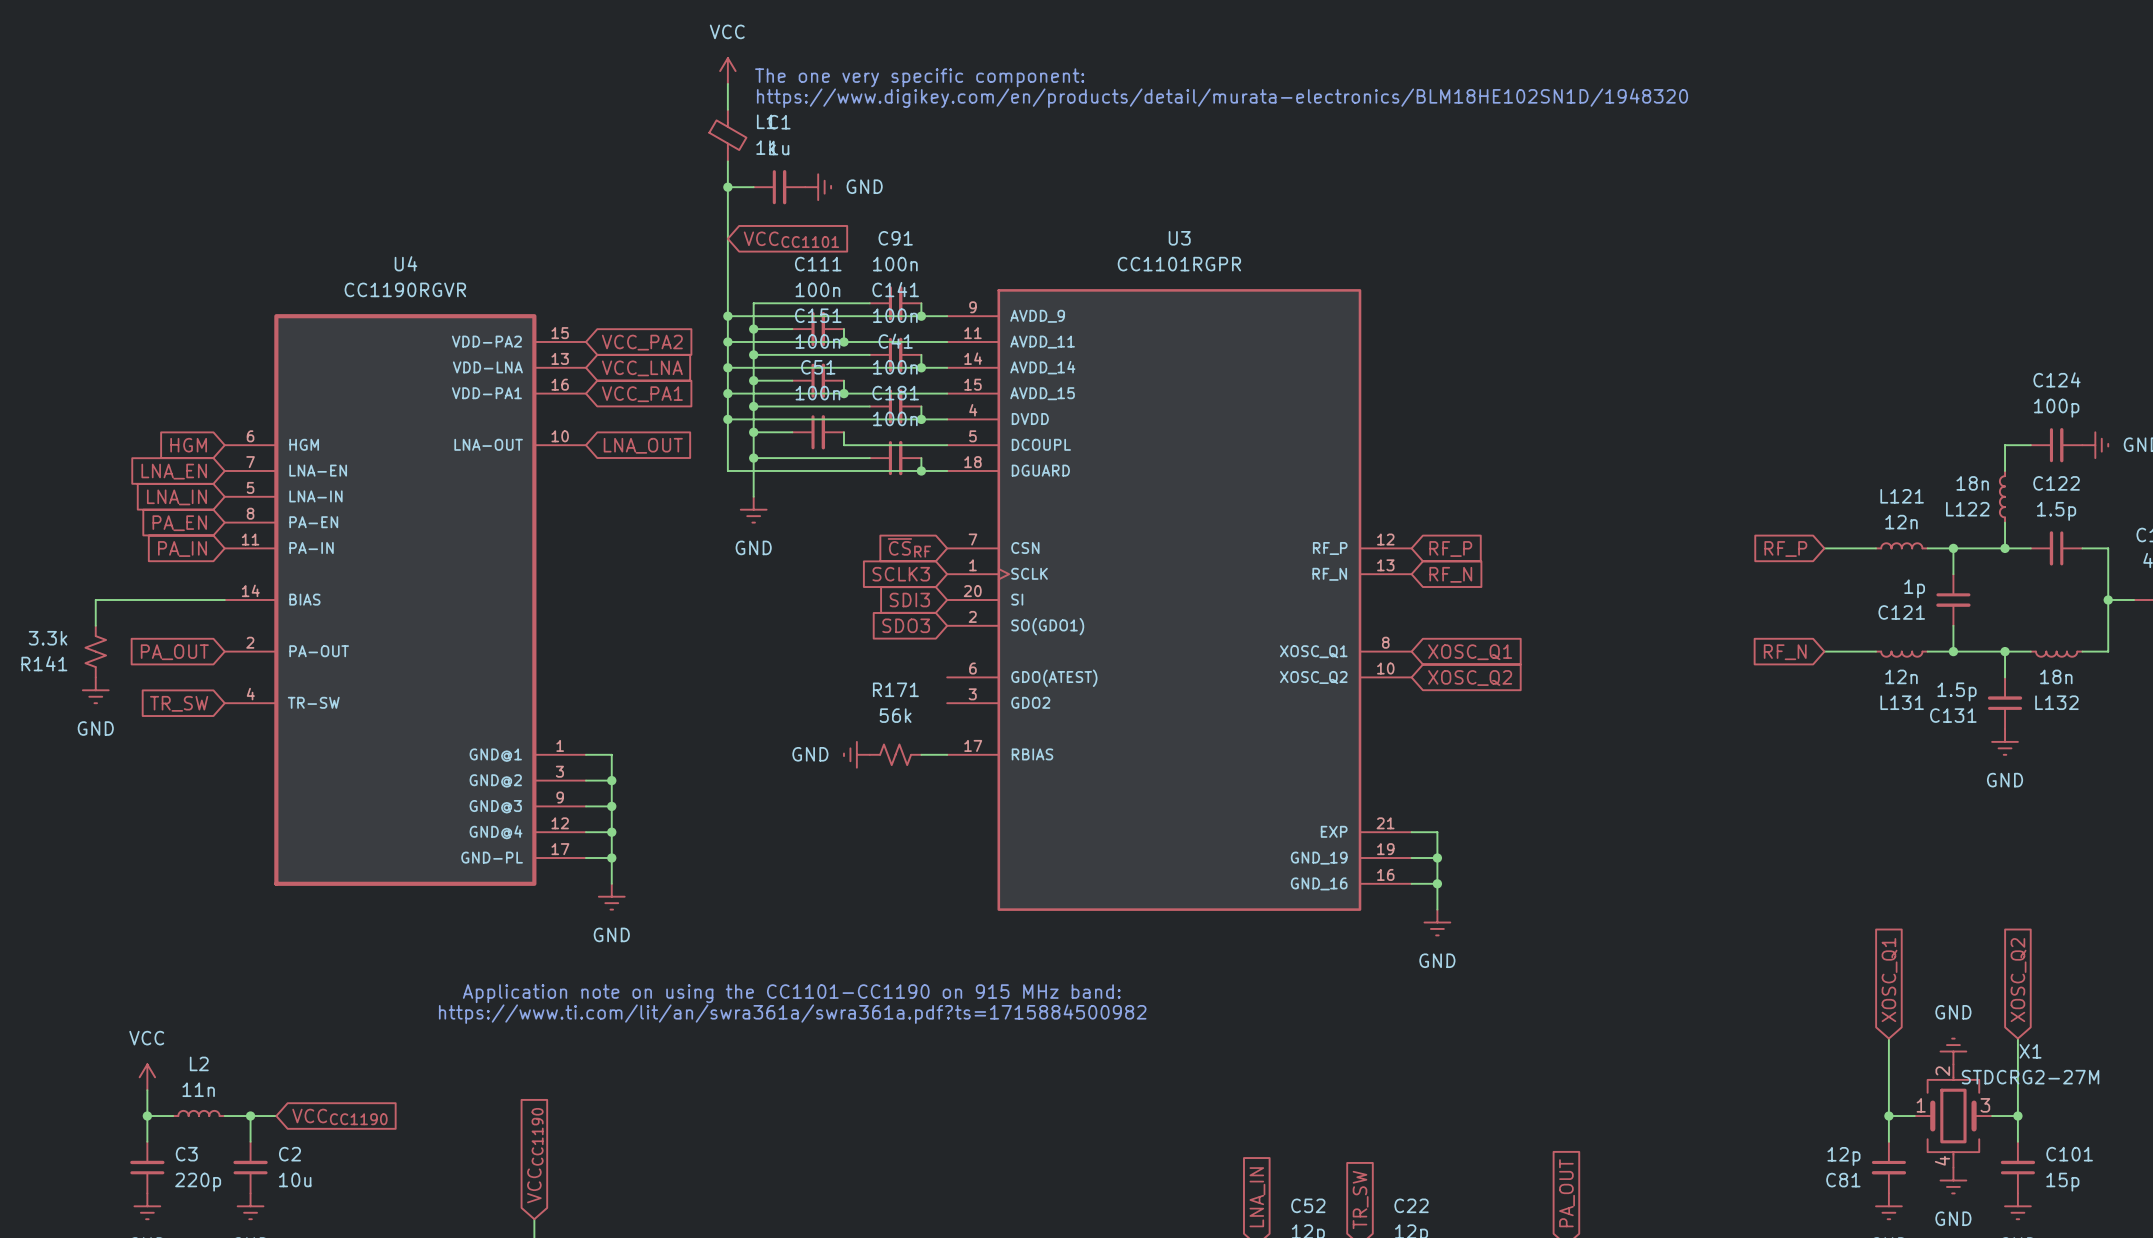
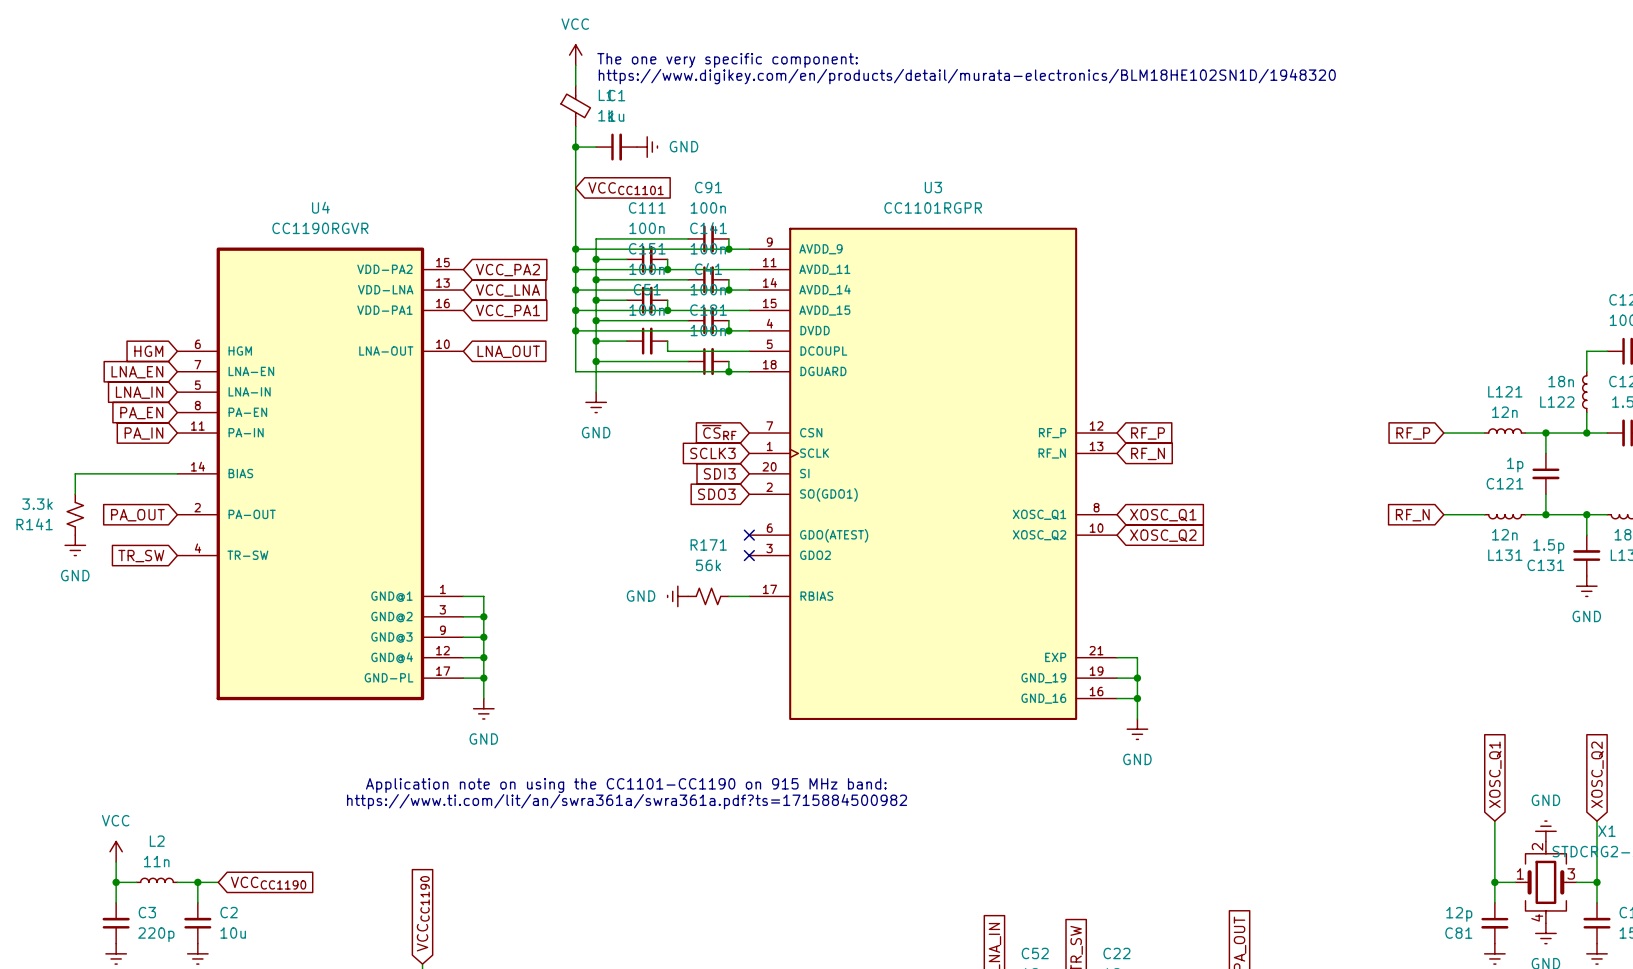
no-connect mark: none -> (749, 535)
no-connect mark: none -> (749, 555)

